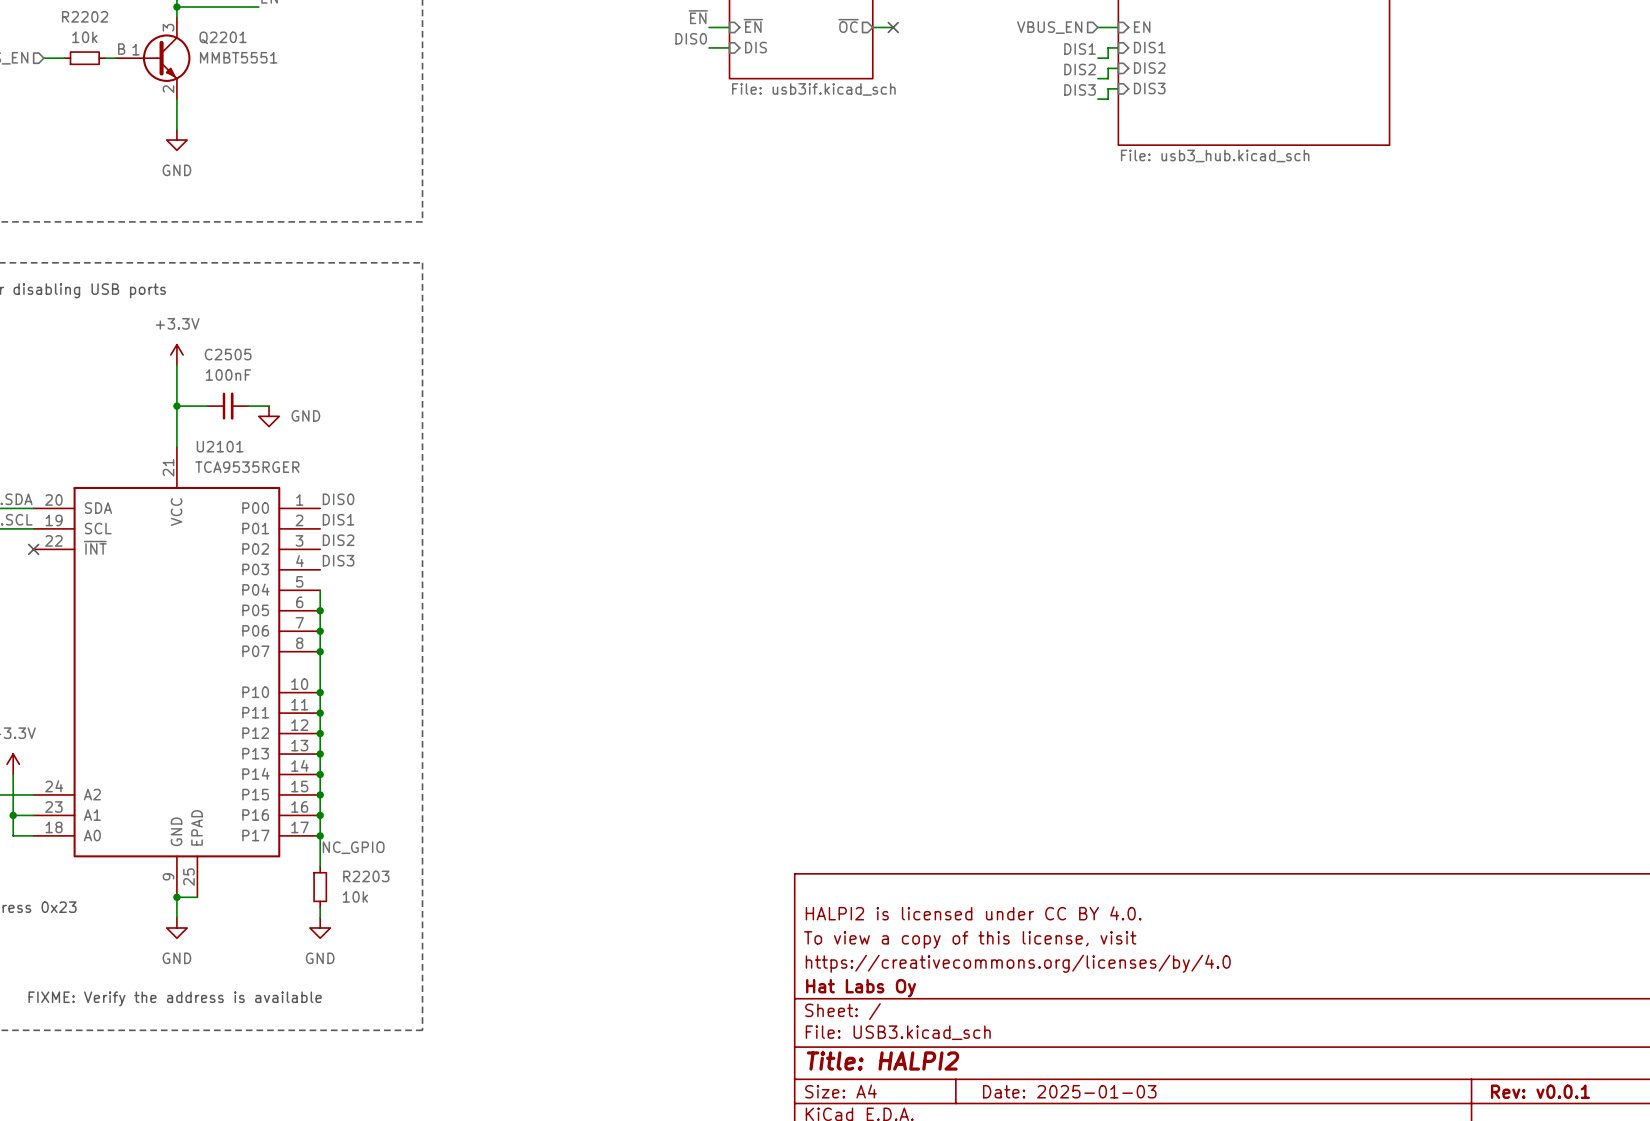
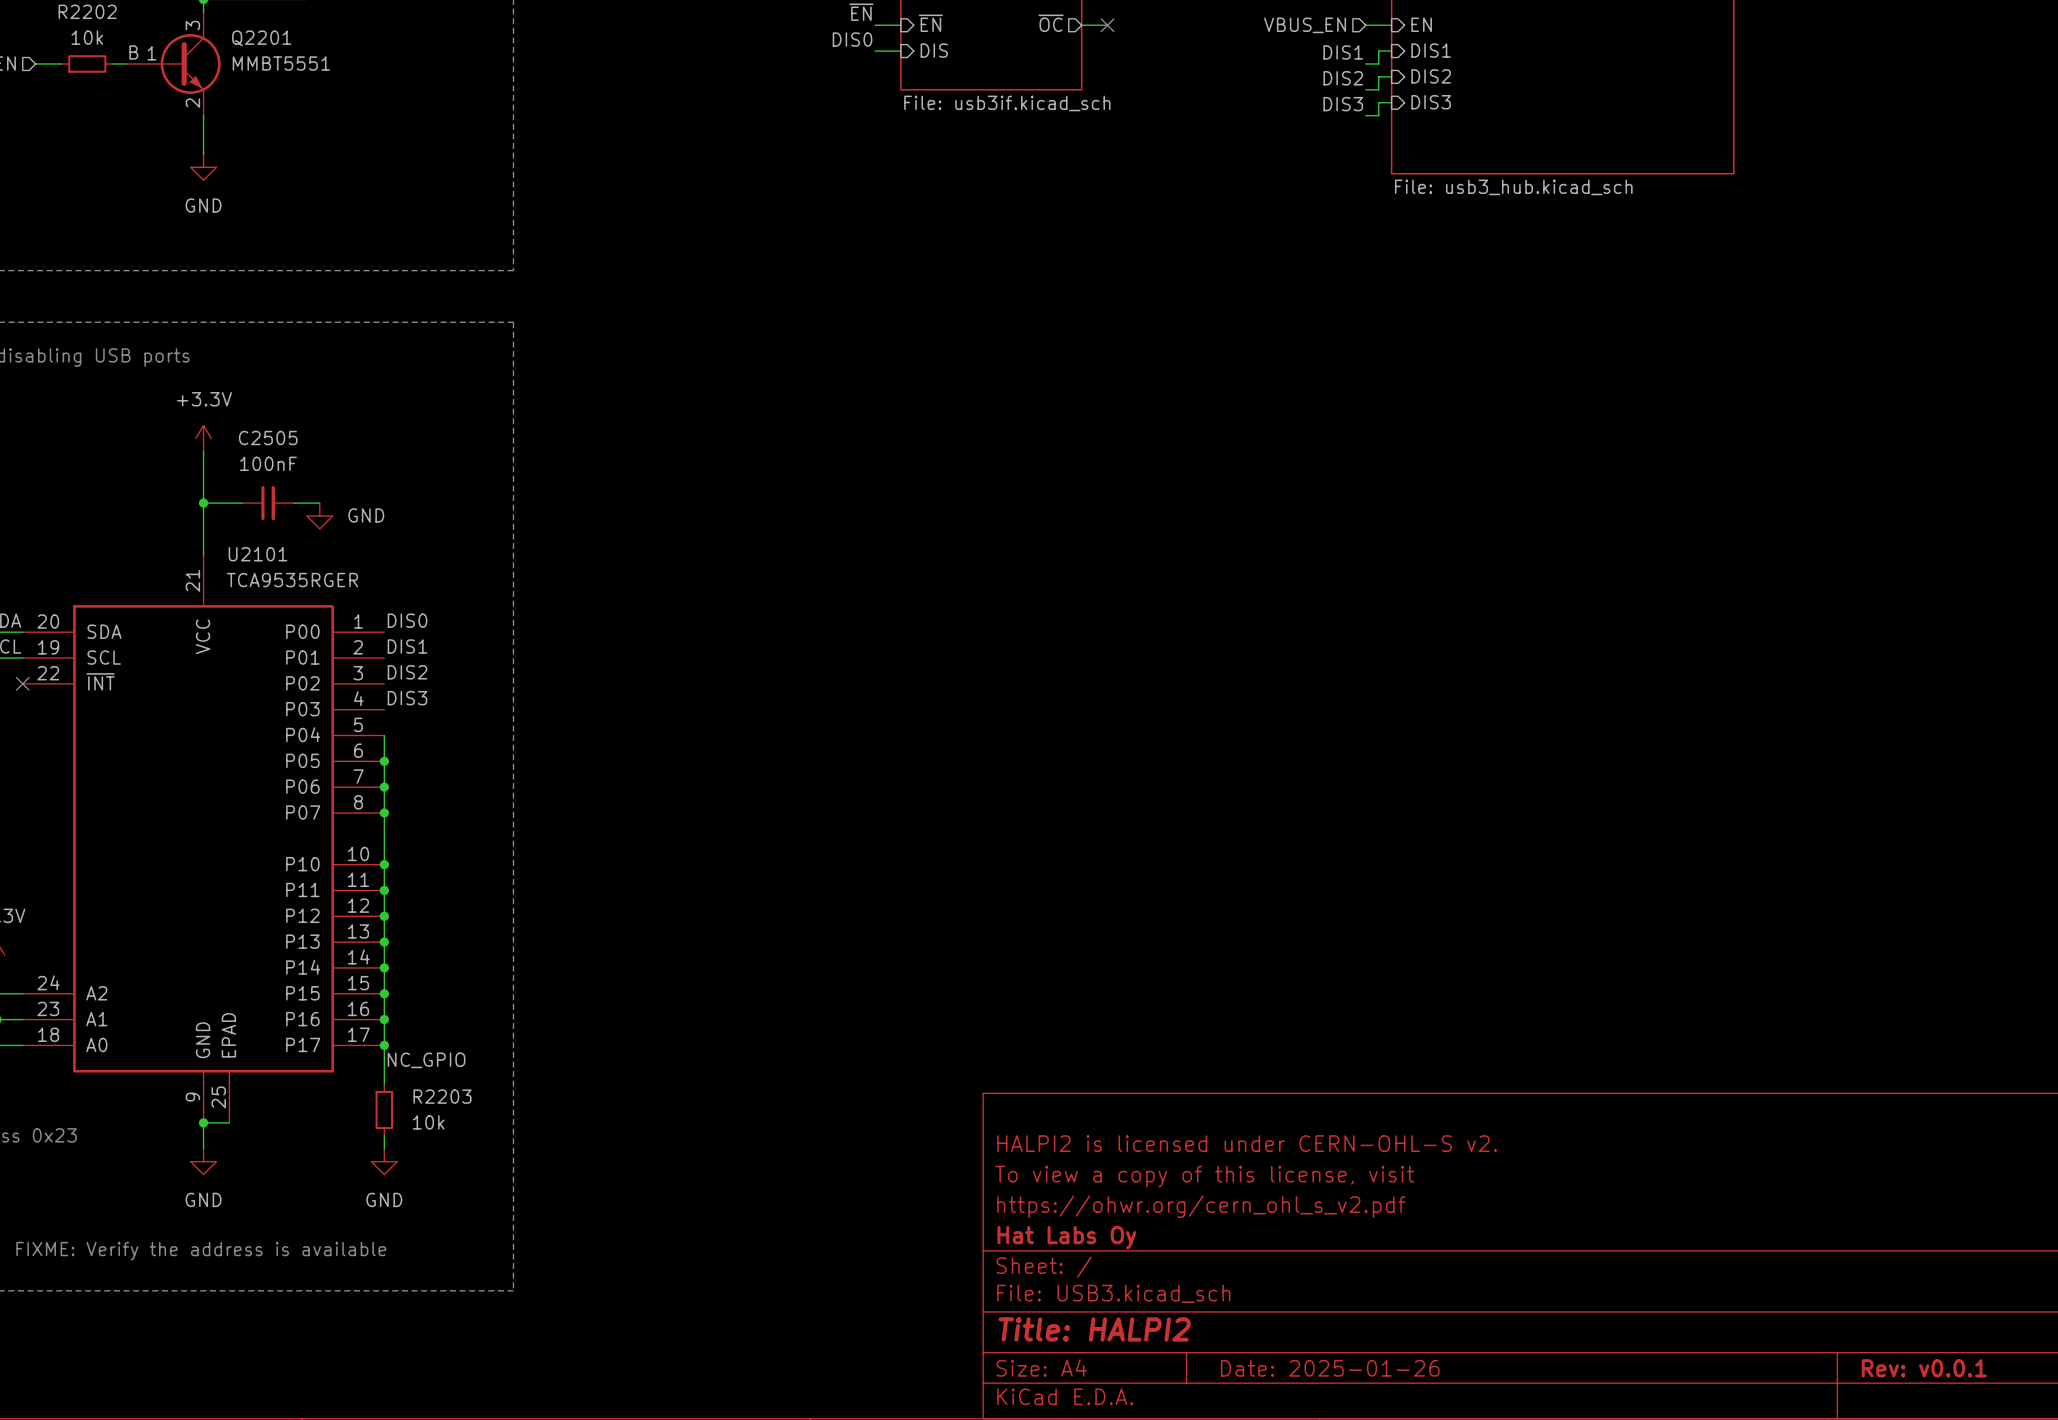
title block: HALPI2 is licensed under CC BY 4.0. (973, 913) -> HALPI2 is licensed under CERN-OHL-S v2. (1247, 1143)
title block: https://creativecommons.org/licenses/by/4.0 (1018, 963) -> https://ohwr.org/cern_ohl_s_v2.pdf (1201, 1206)
title block: Date: 2025-01-03 (1069, 1091) -> Date: 2025-01-26 (1330, 1368)

